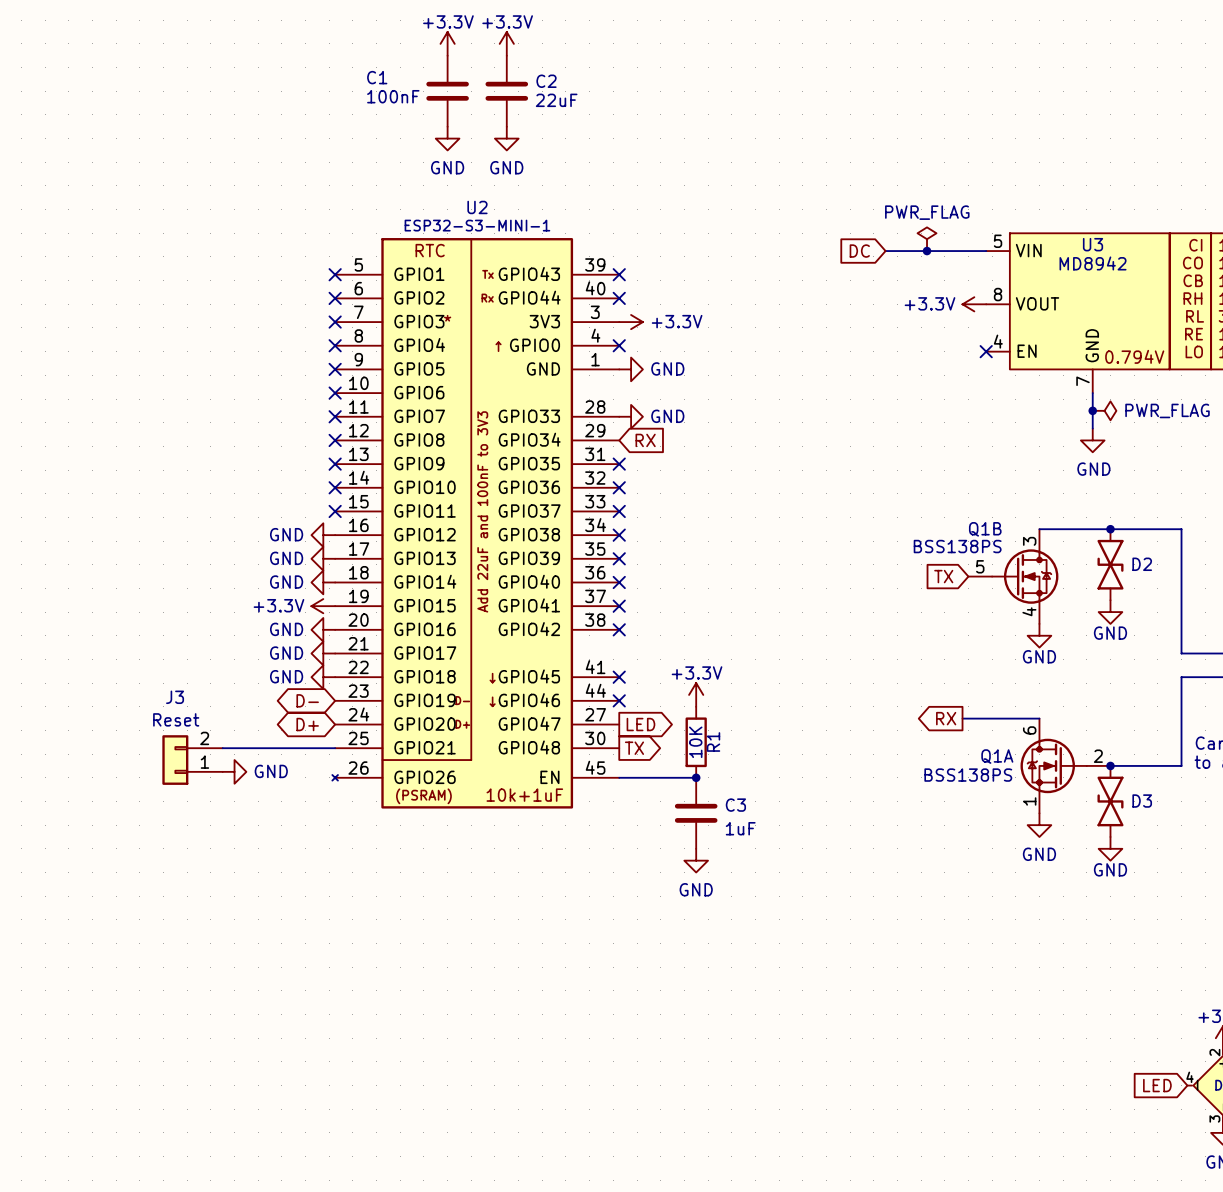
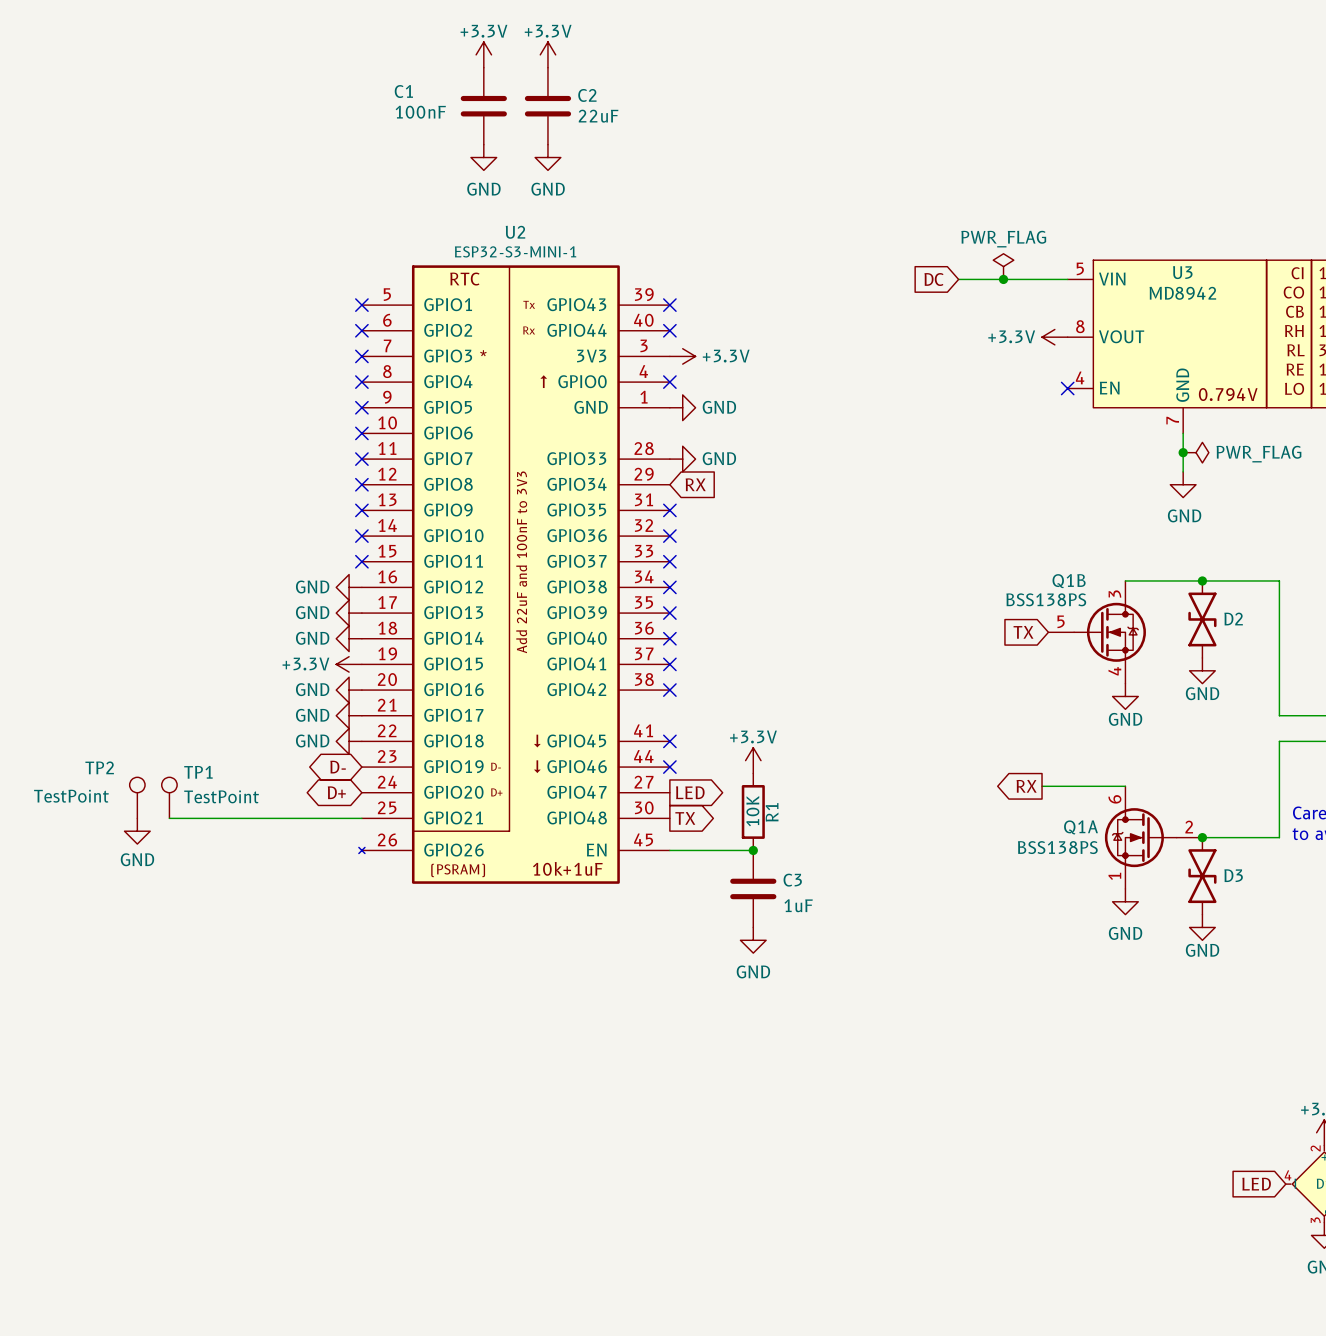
TP2: none -> TestPoint (137, 797)
TP1: none -> TestPoint (169, 797)
J3: Reset (192, 760) -> none
power symbol rotation: 0° (234, 771) -> 90° clockwise (137, 831)
power symbol position: GND (234, 771) -> GND (137, 831)

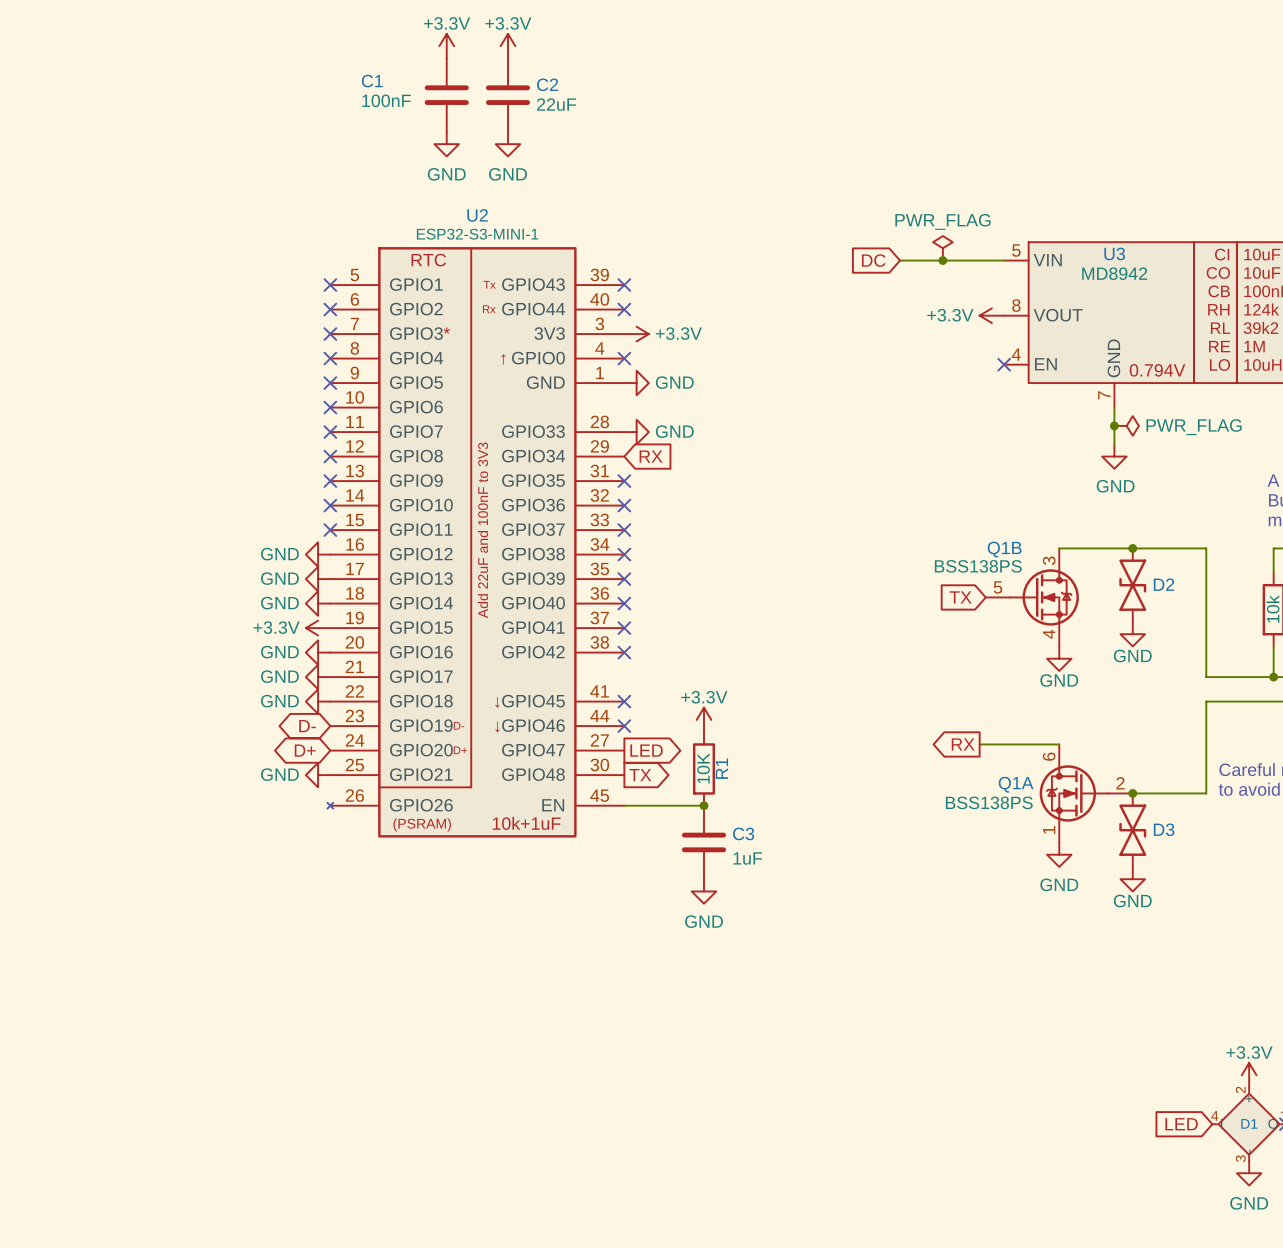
TP2: TestPoint (137, 797) -> none
TP1: TestPoint (169, 797) -> none
wire: (169, 818) (361, 818) -> none
power symbol rotation: 0° (137, 831) -> 90° clockwise (318, 775)
power symbol position: GND (137, 831) -> GND (318, 775)

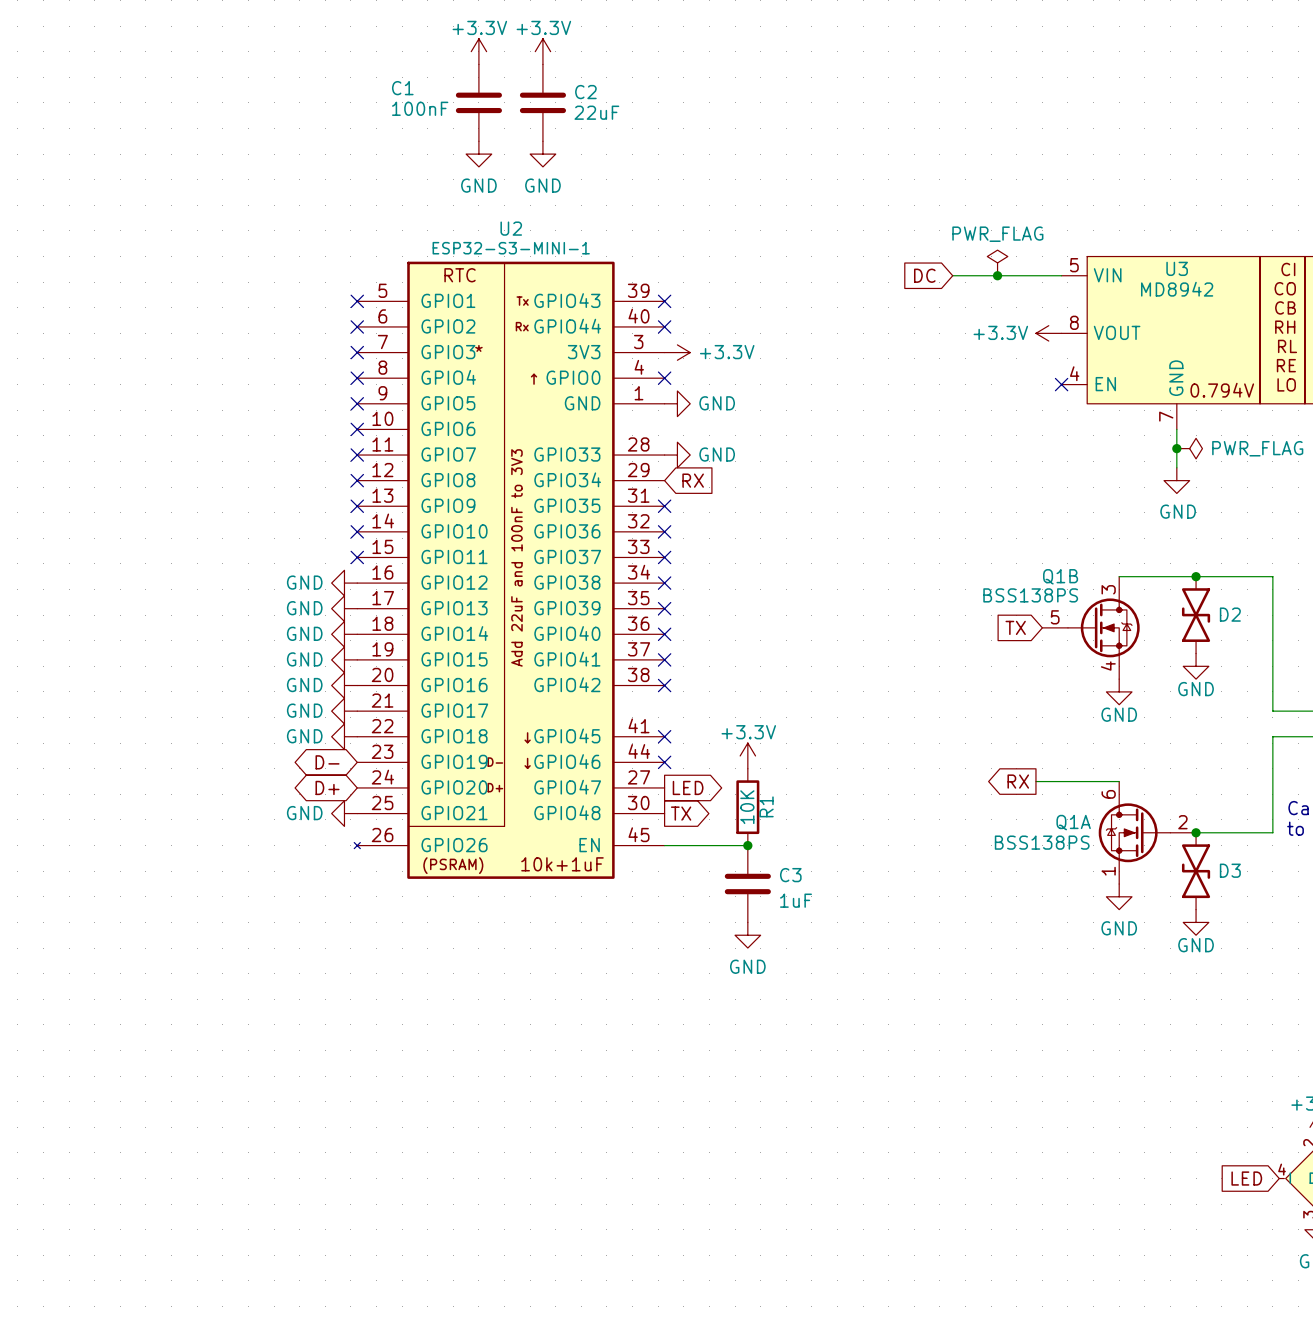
power symbol: +3.3V (318, 628) -> GND (344, 659)

